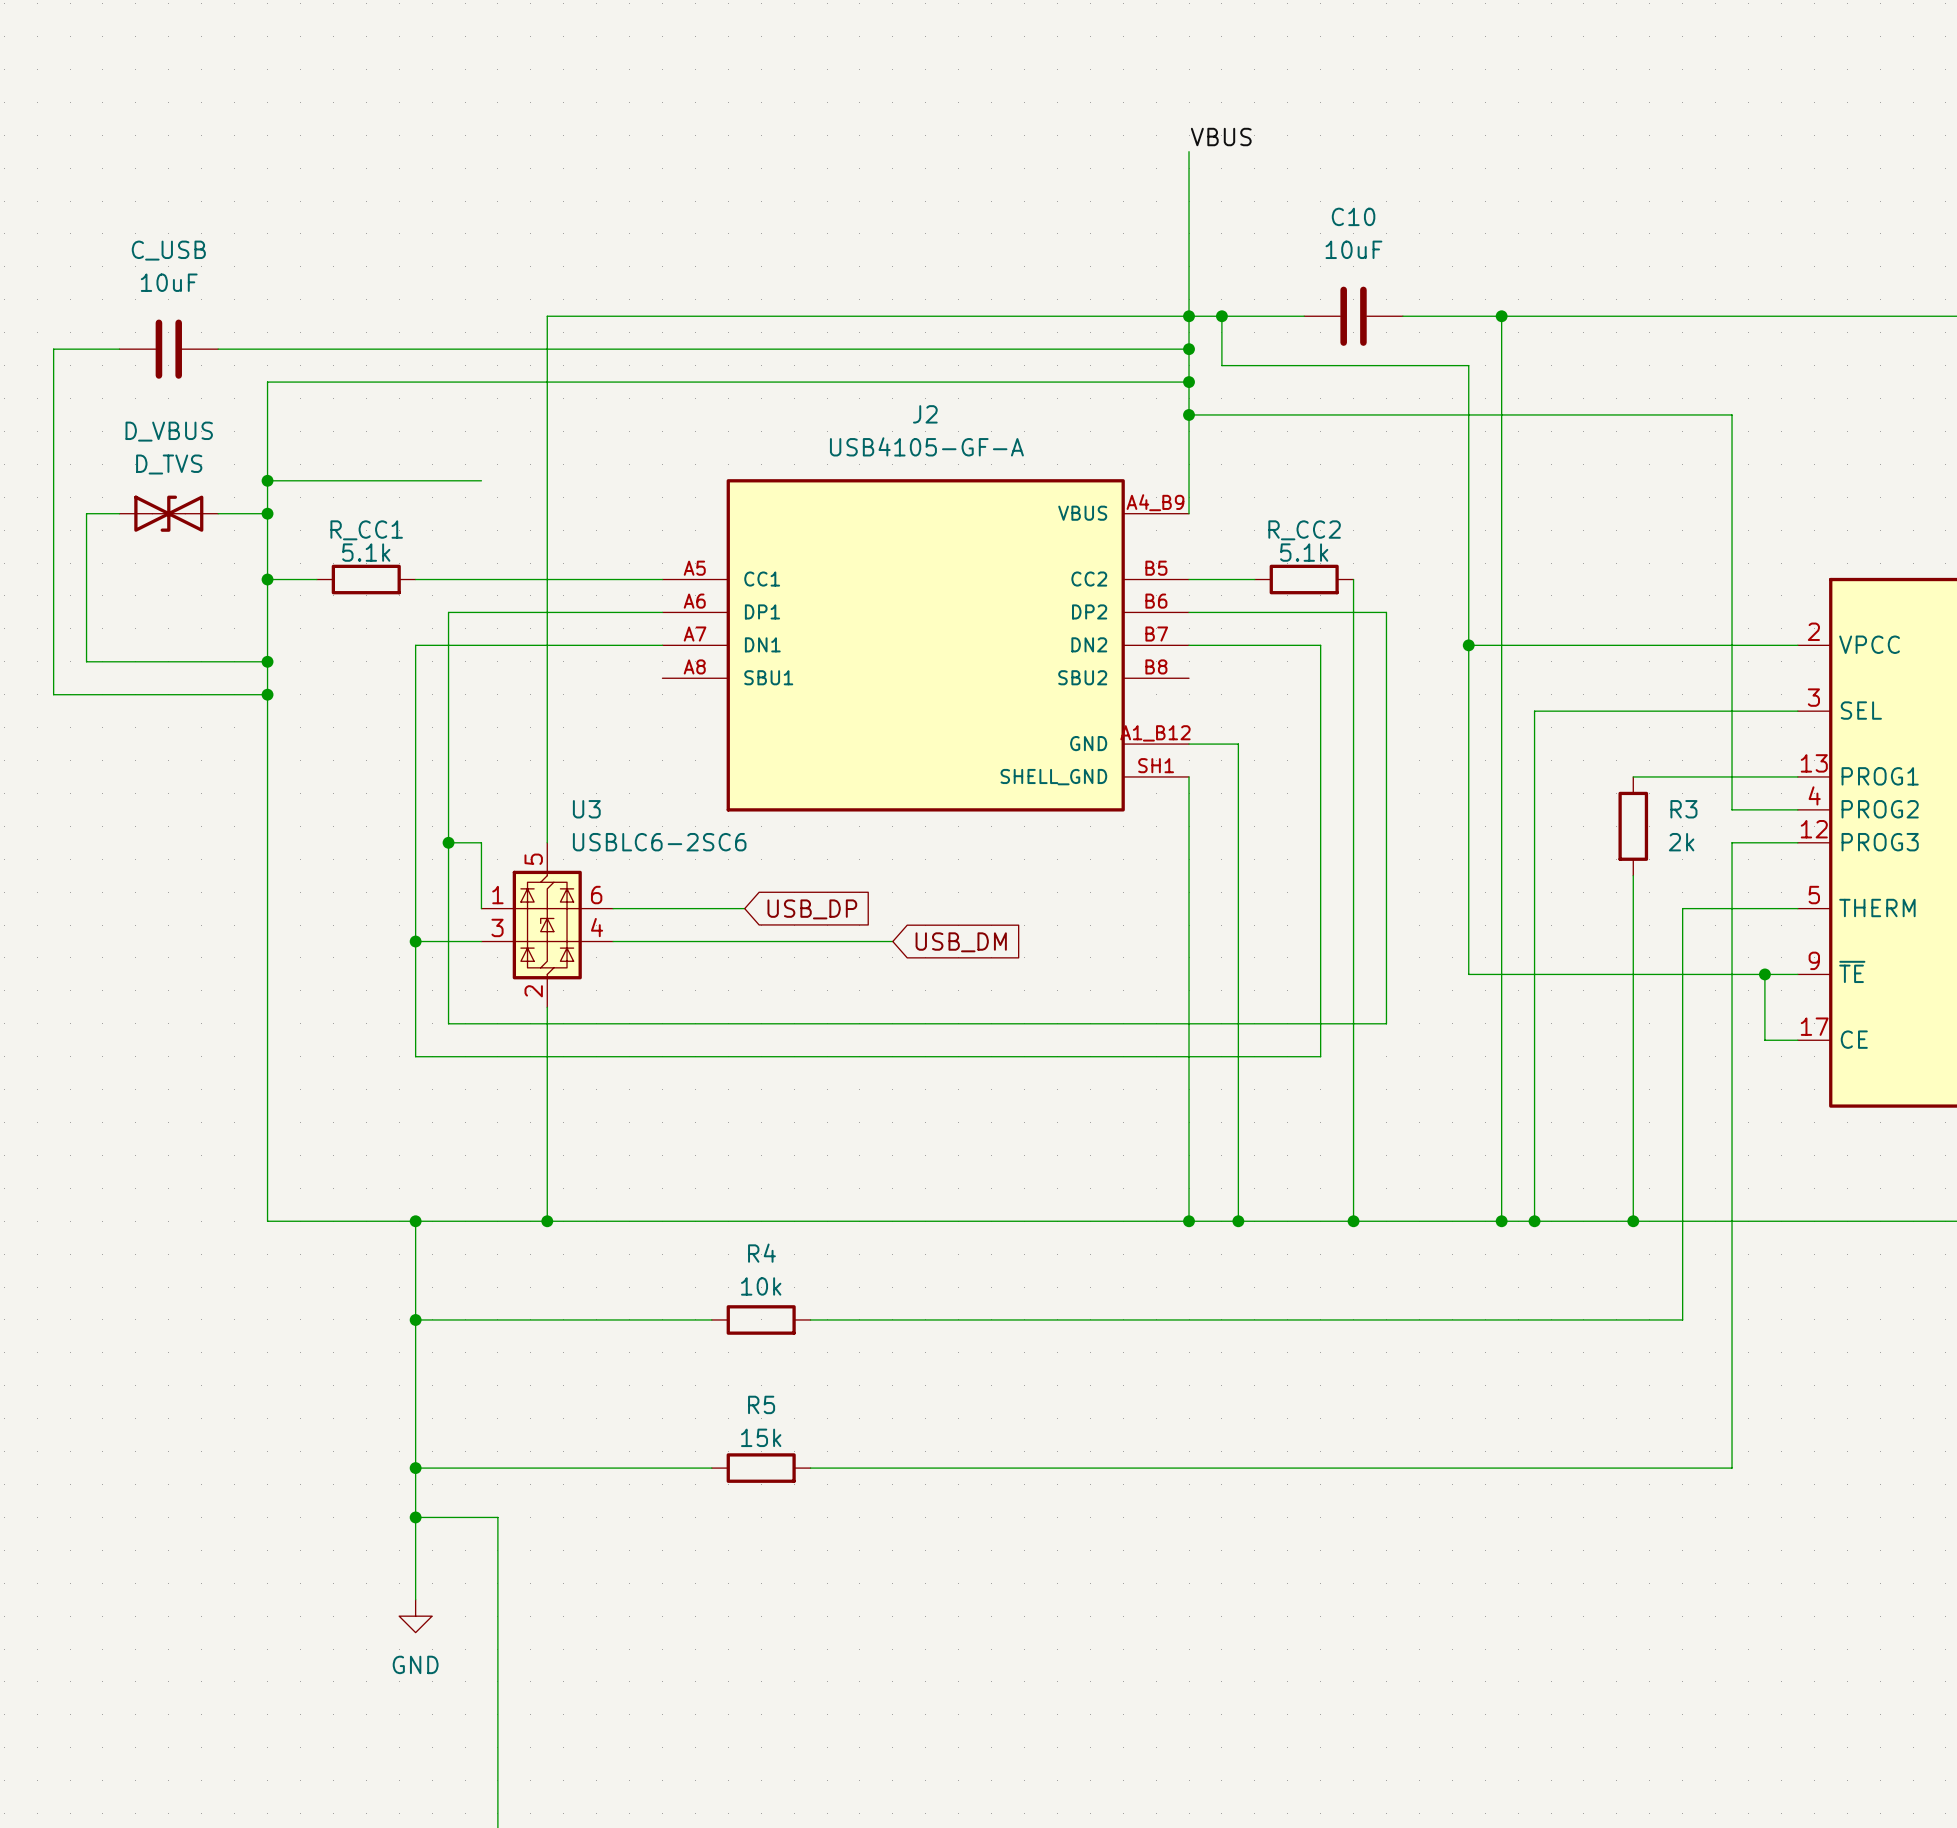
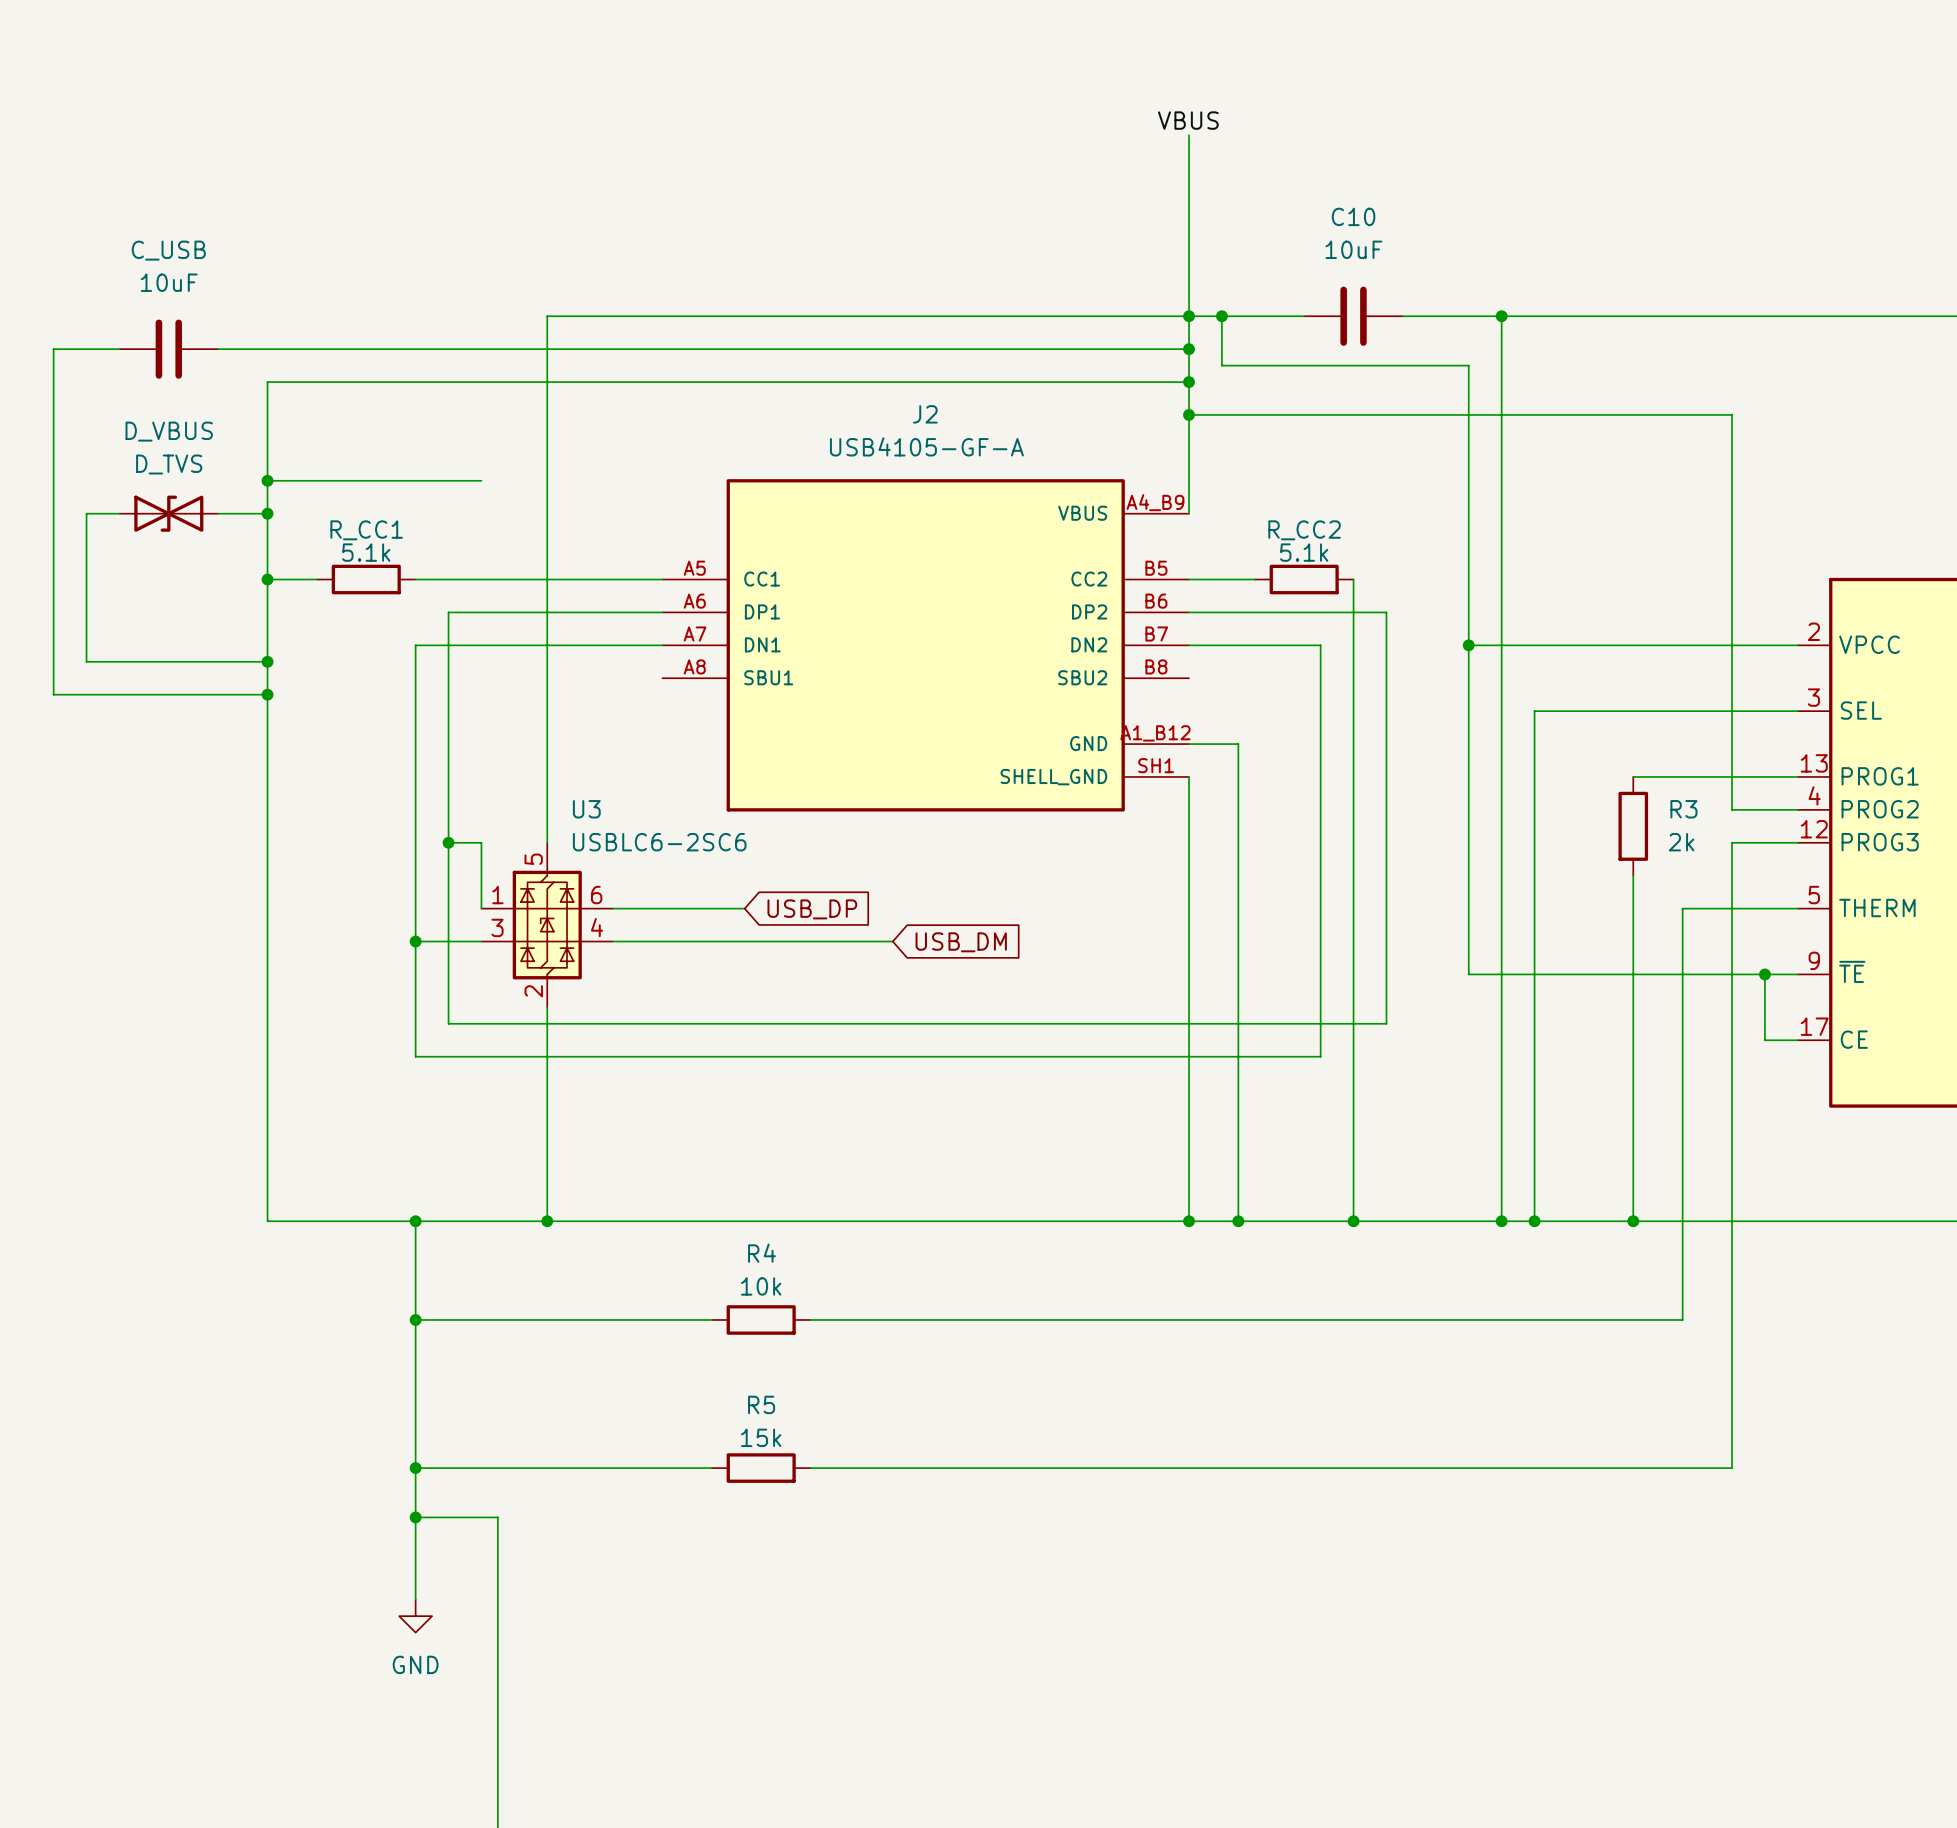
wire: none -> (1189, 135) (1189, 151)
label position: VBUS (1221, 137) -> VBUS (1188, 120)

